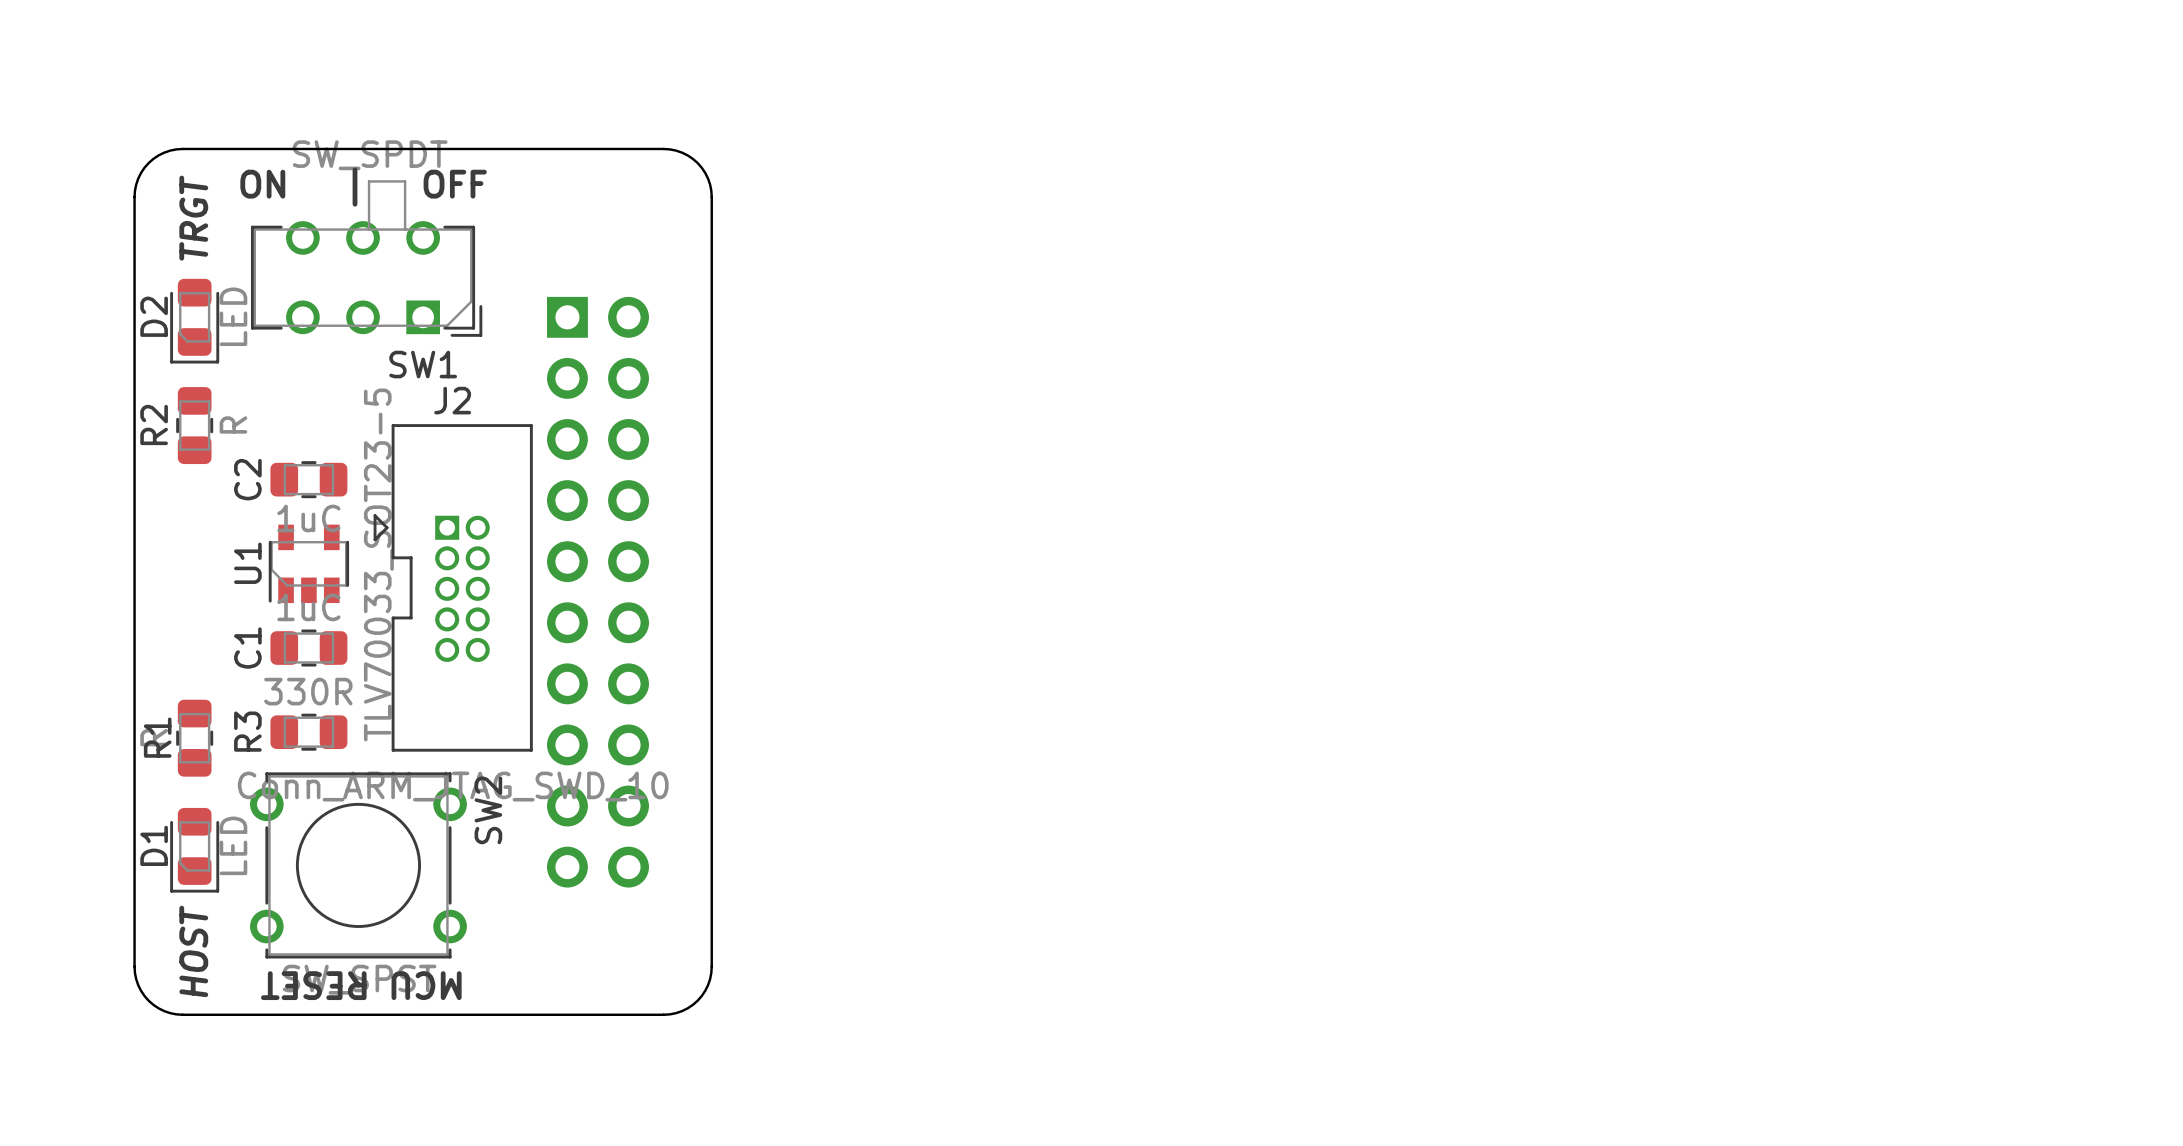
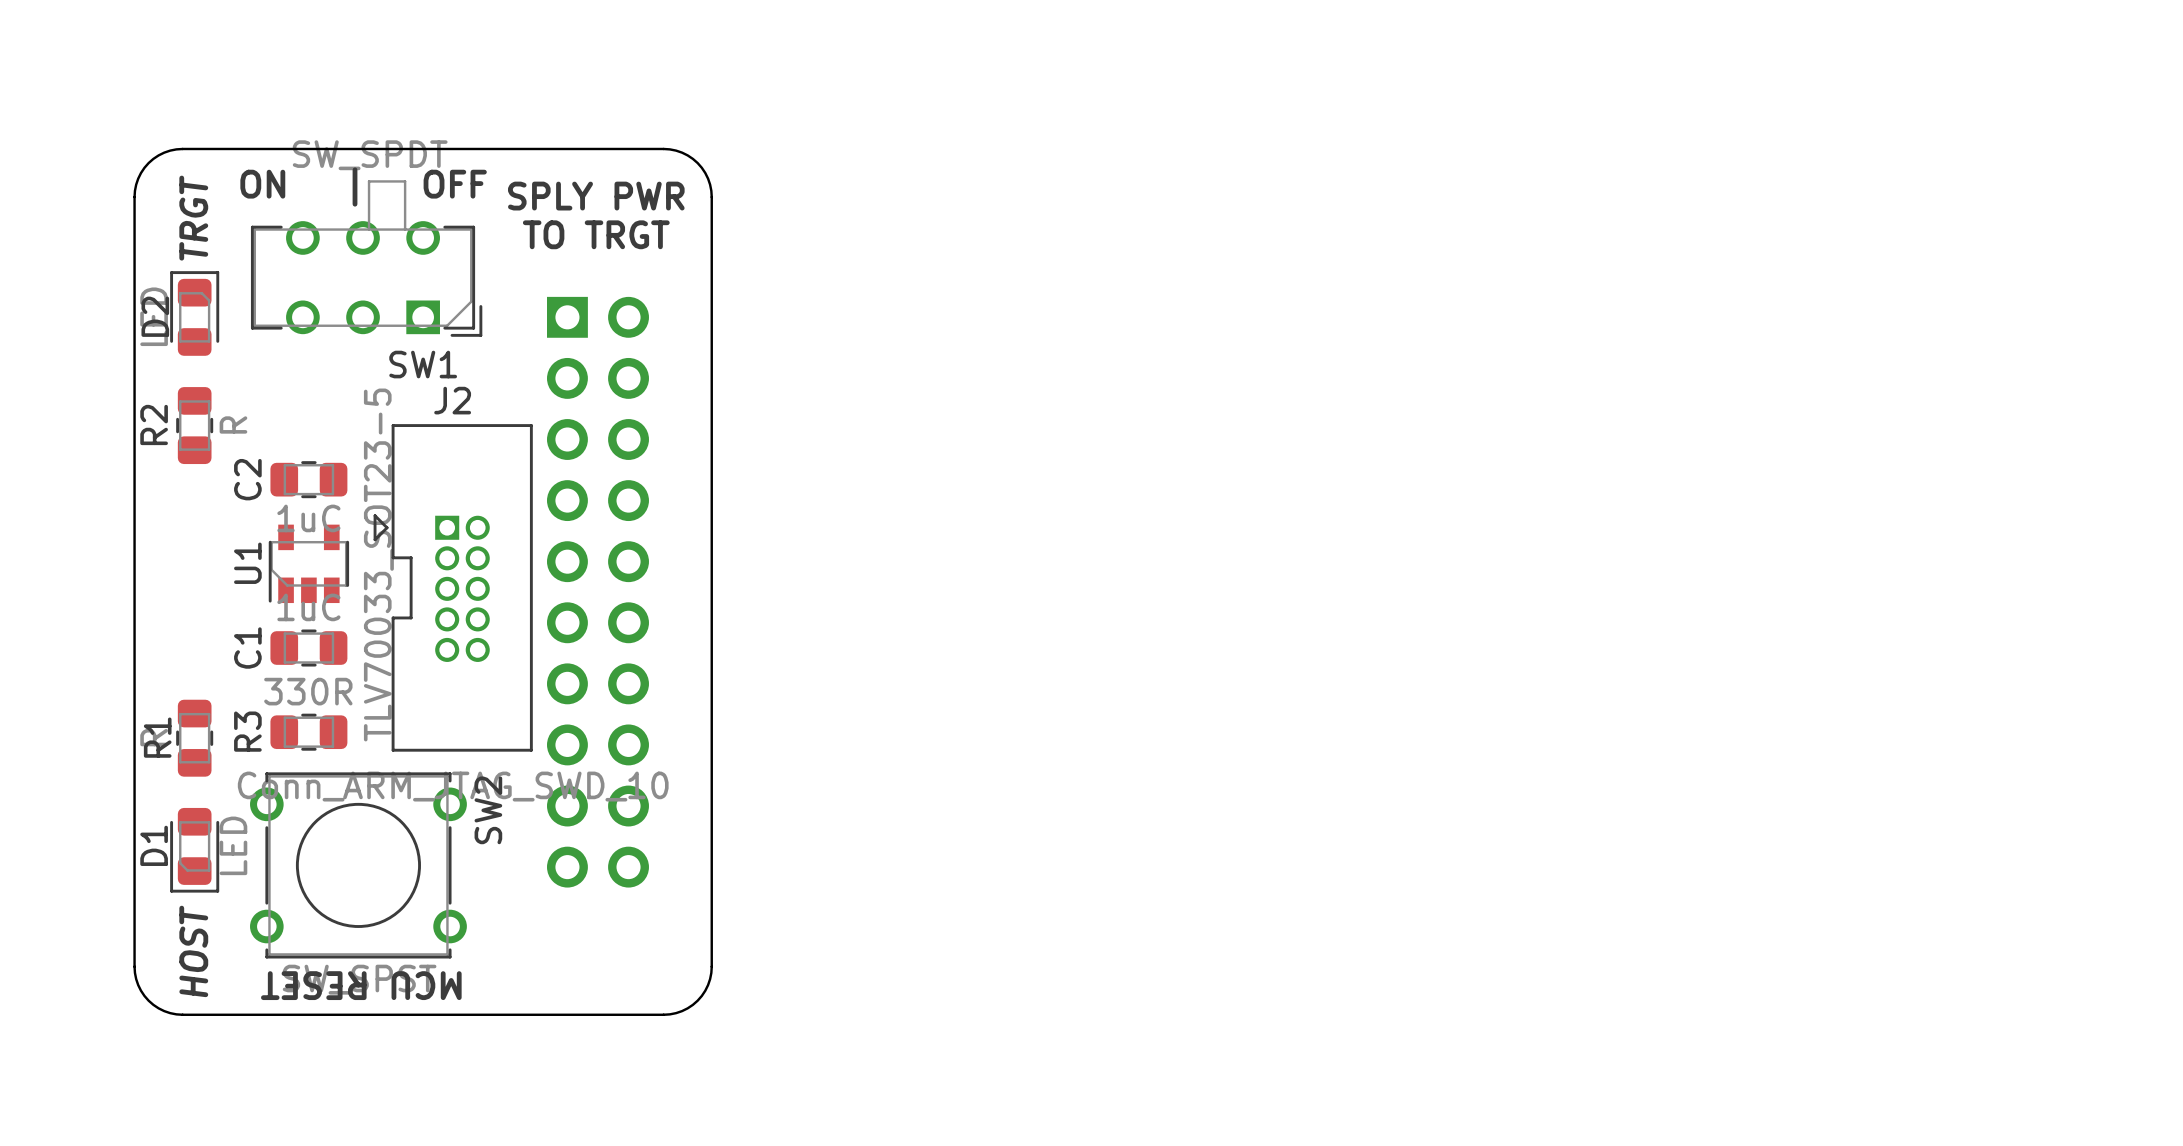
text: none -> SPLY PWR (596, 196)
text: none -> TO TRGT (596, 234)
D2 rotation: 0° (194, 321) -> 180° (194, 313)

